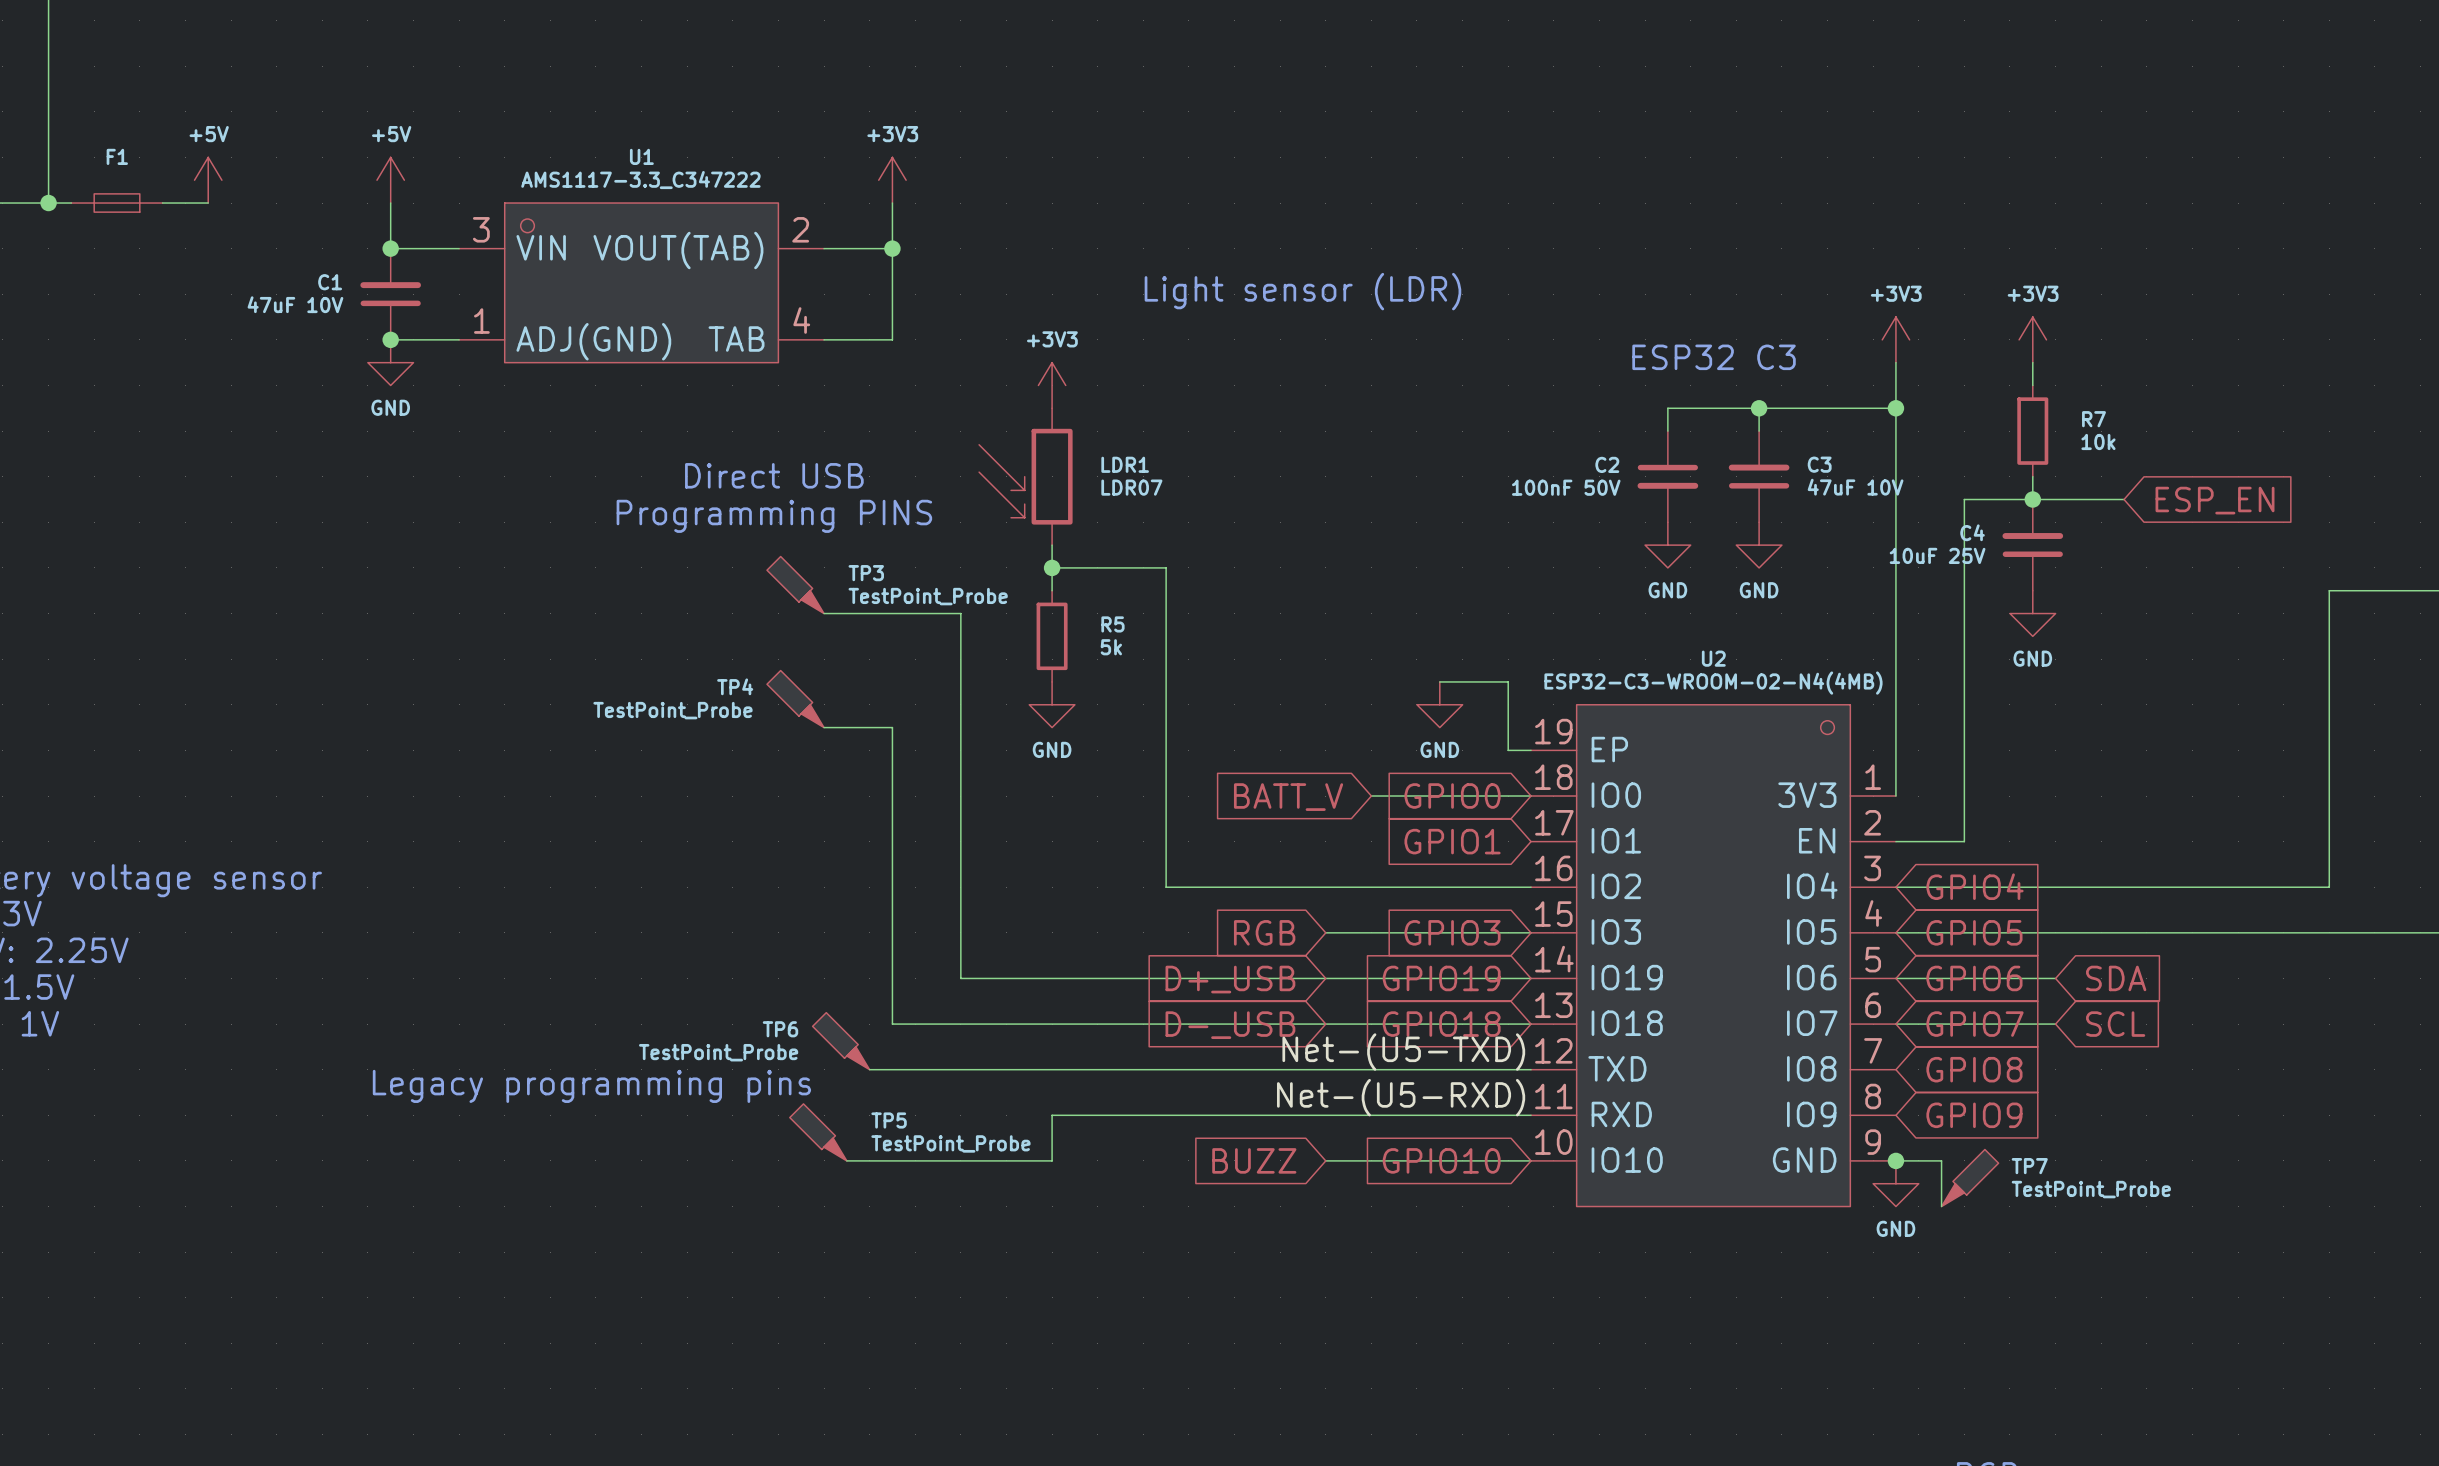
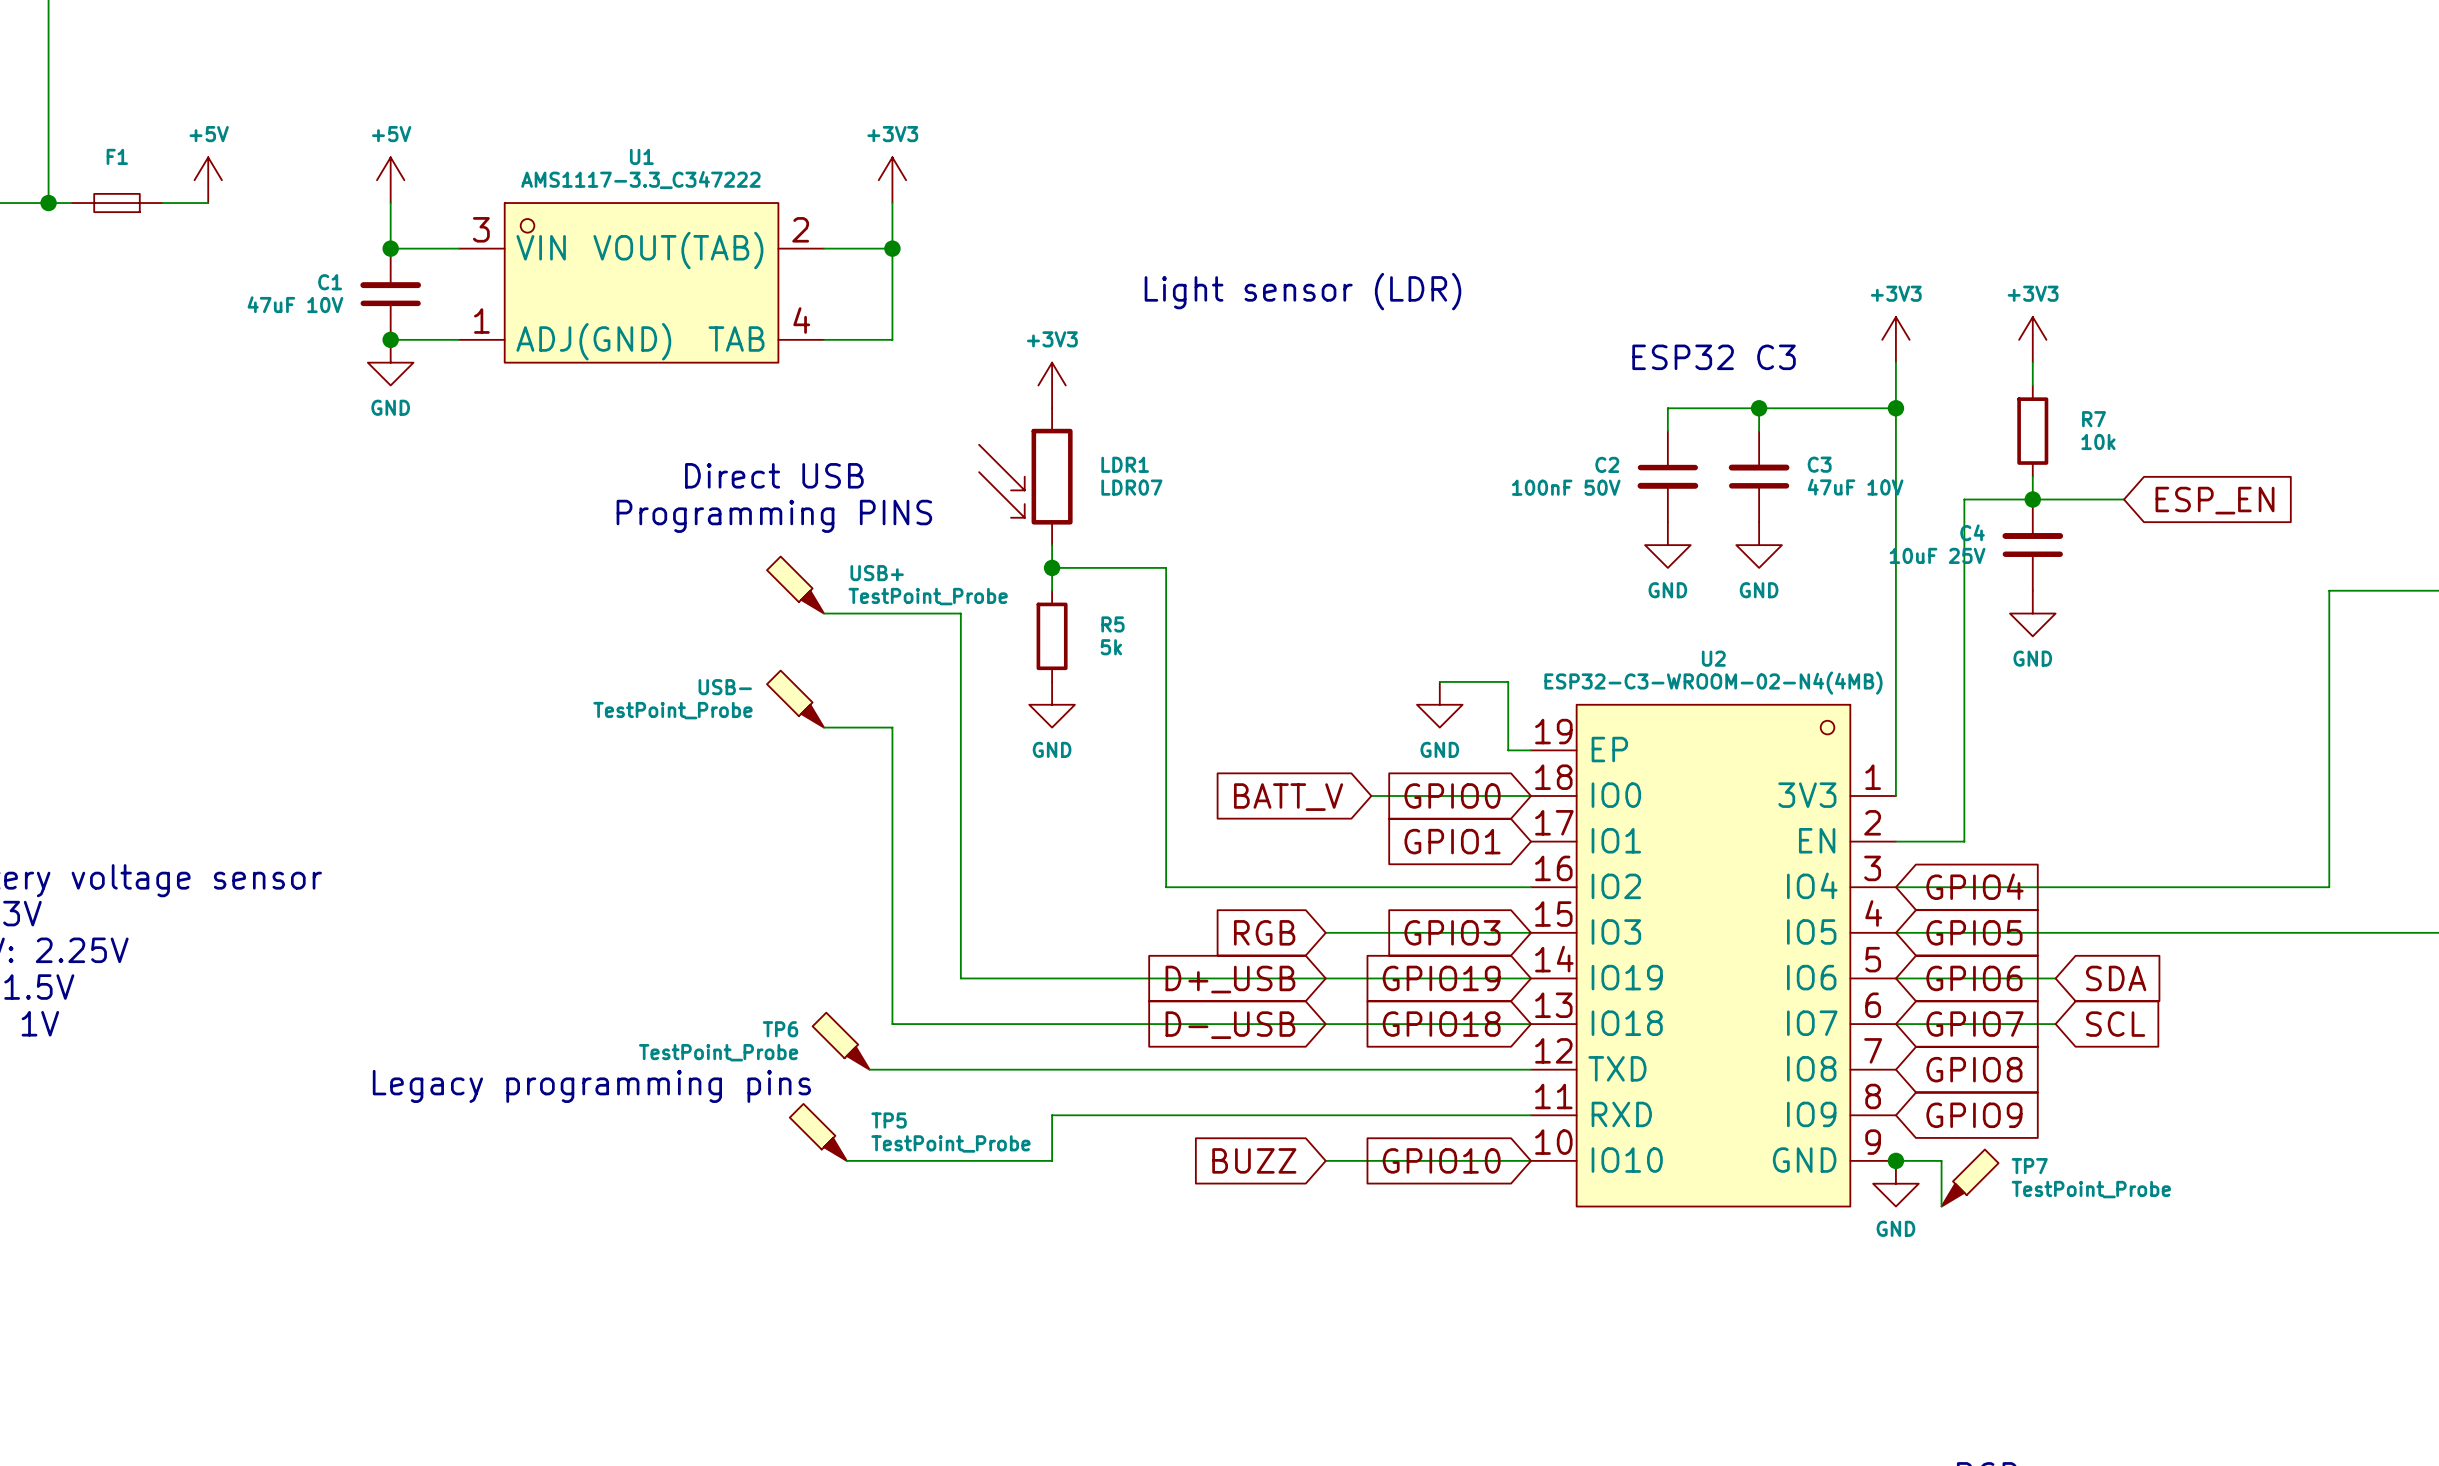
TP3 name: TP3 (866, 573) -> USB+ (877, 573)
TP4 name: TP4 (735, 686) -> USB- (725, 687)
label: Net-(U5-TXD) (1403, 1052) -> none
label: Net-(U5-RXD) (1401, 1097) -> none

